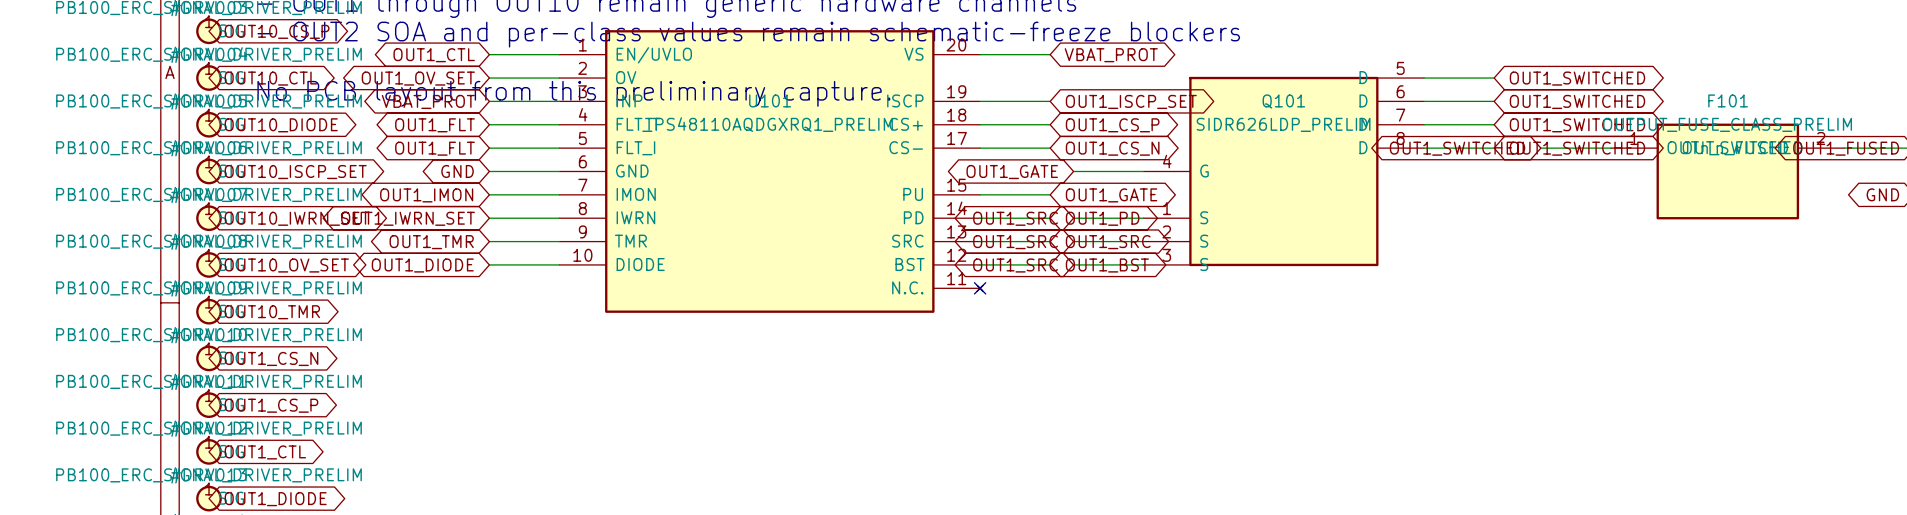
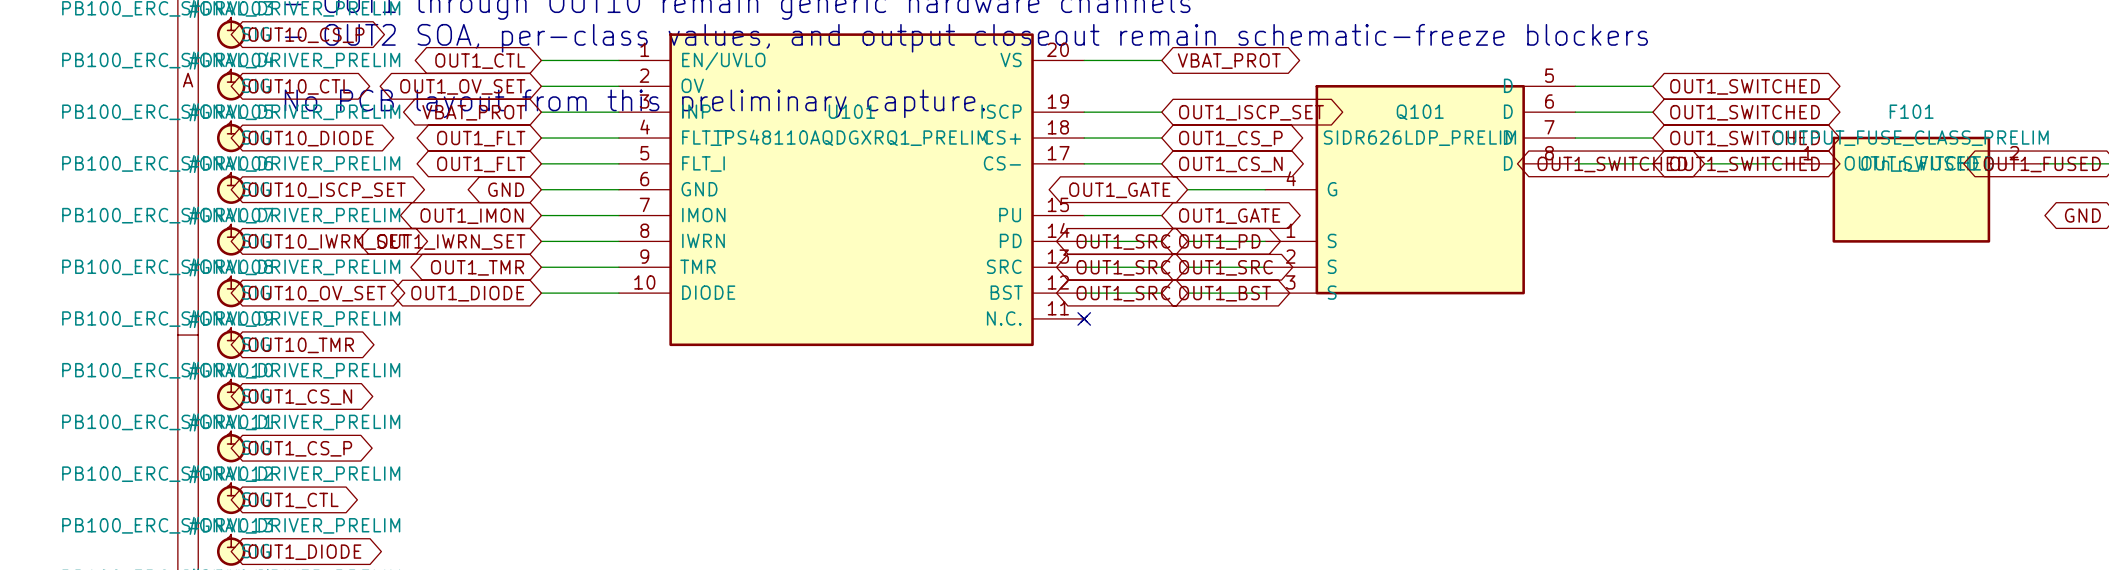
text: - OUT2 SOA and per-class values remain schematic-freeze blockers (748, 34) -> - OUT2 SOA, per-class values, and output closeout remain schematic-freeze blockers (966, 38)

